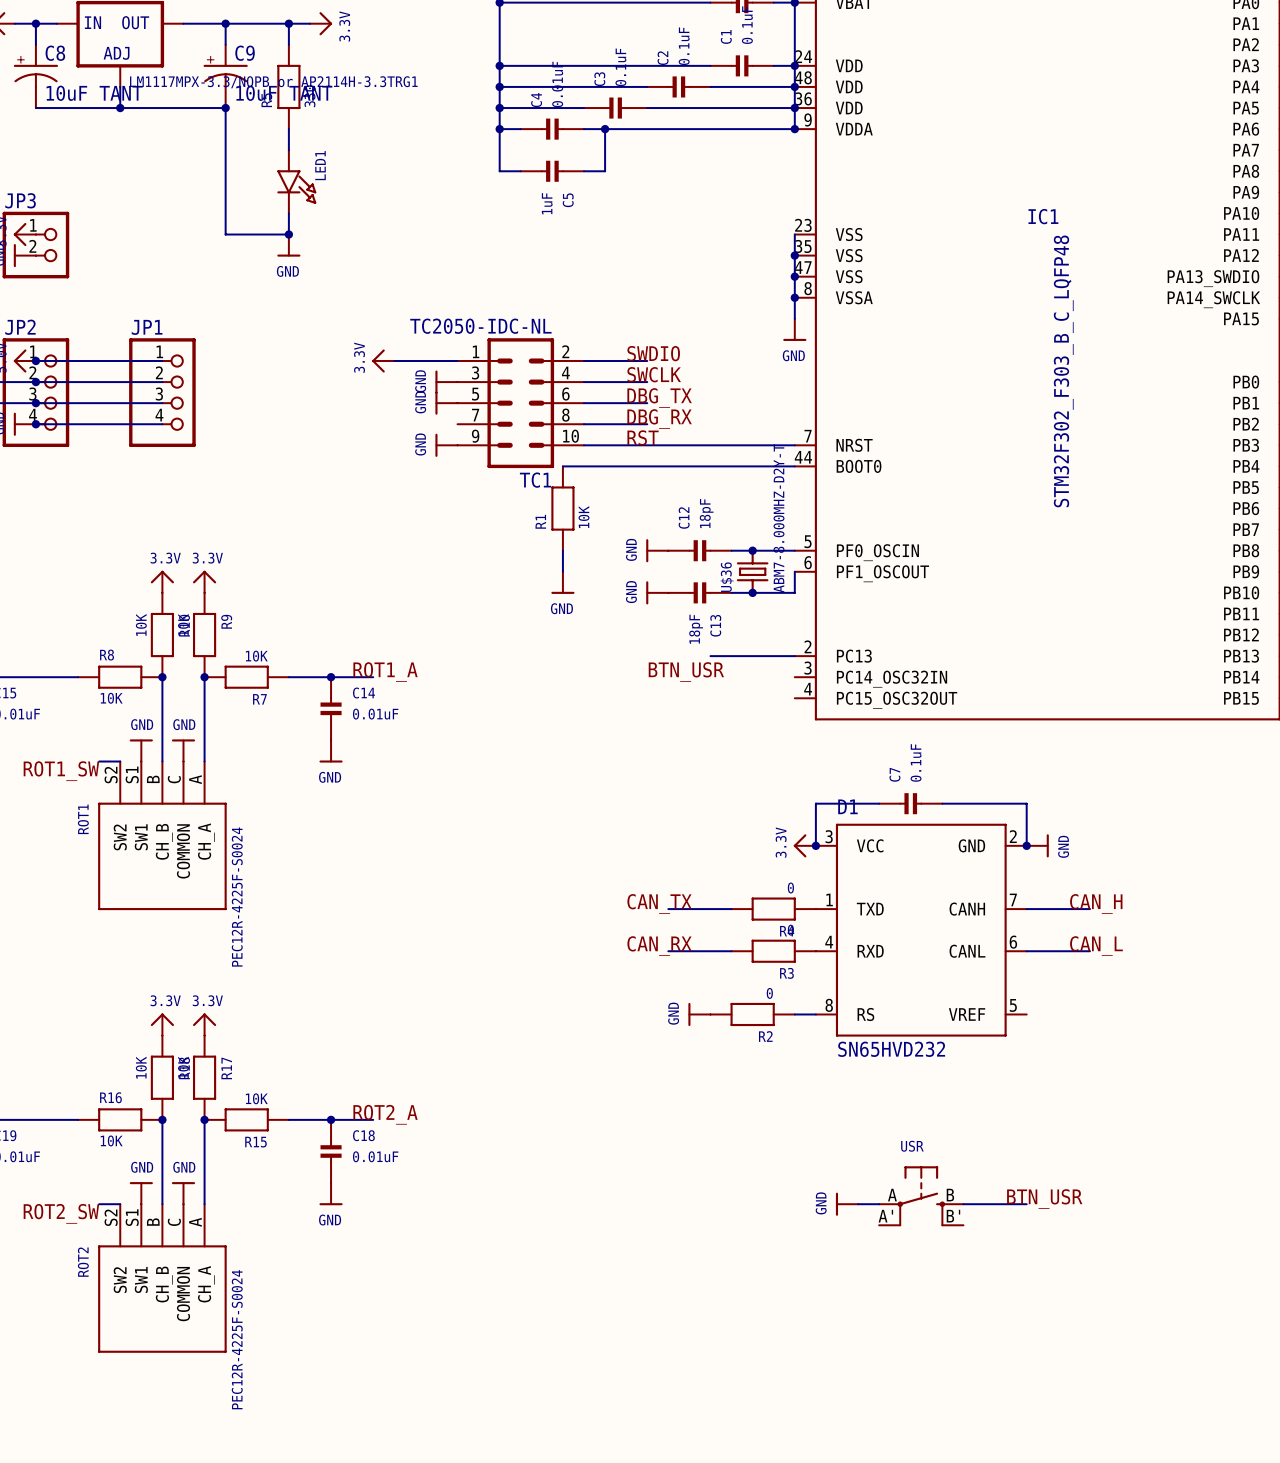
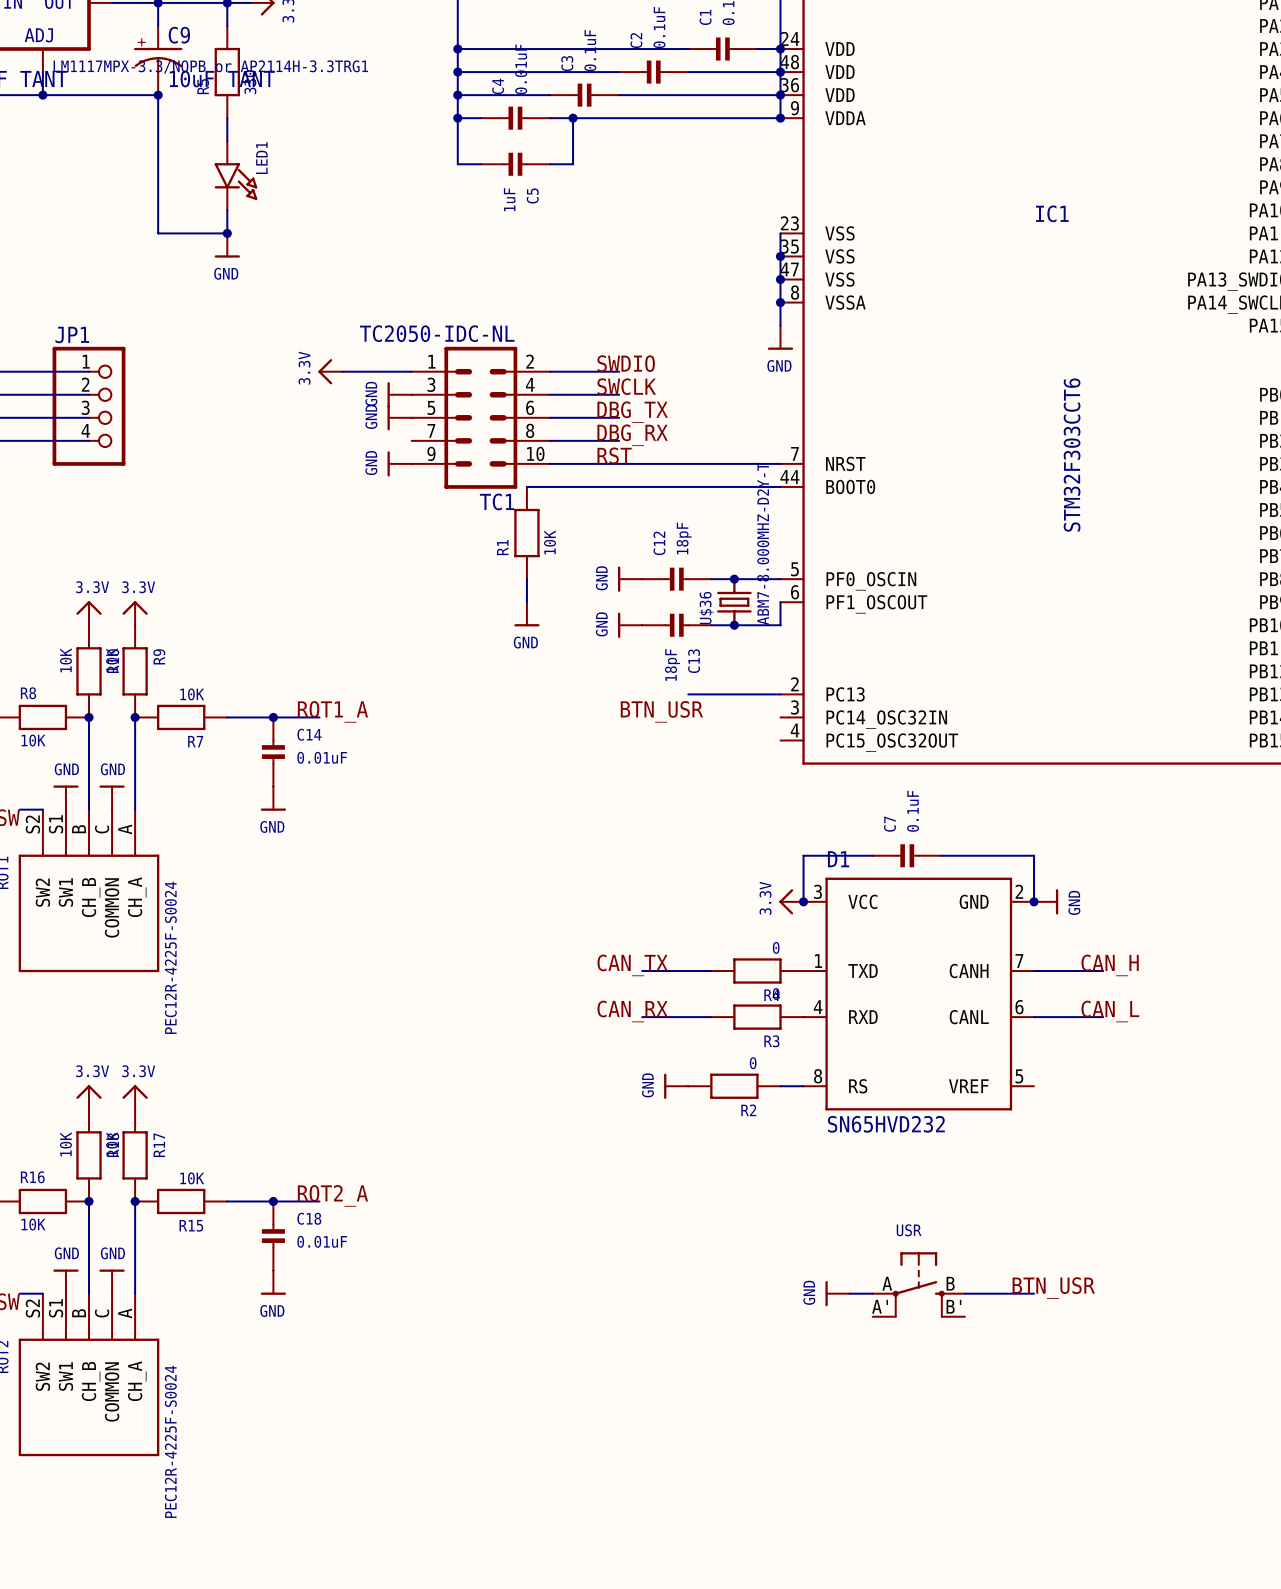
IC1 value: STM32F302_F303_B_C_LQFP48 (1063, 371) -> STM32F303CCT6 (1072, 455)

